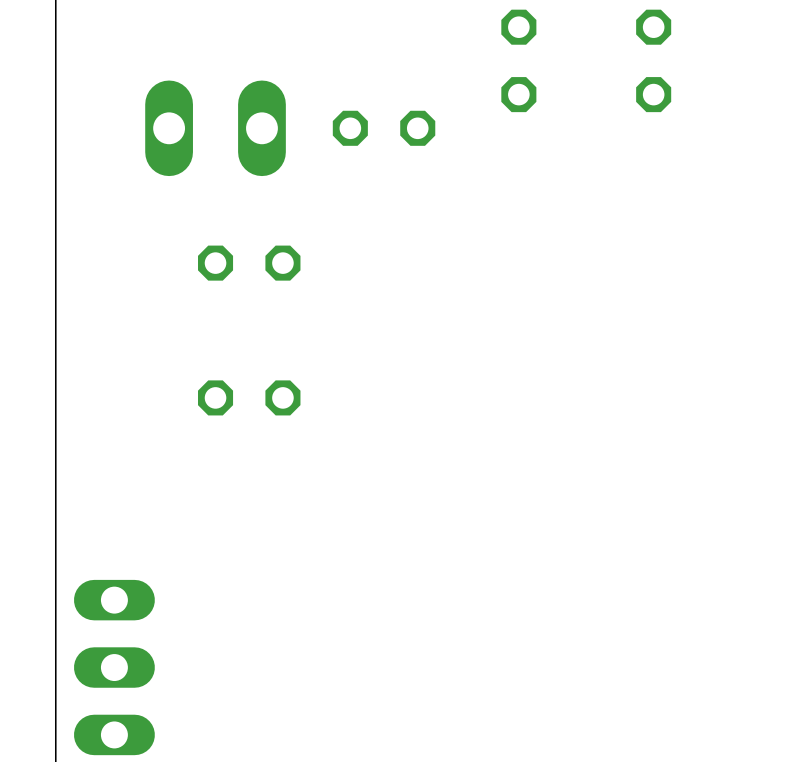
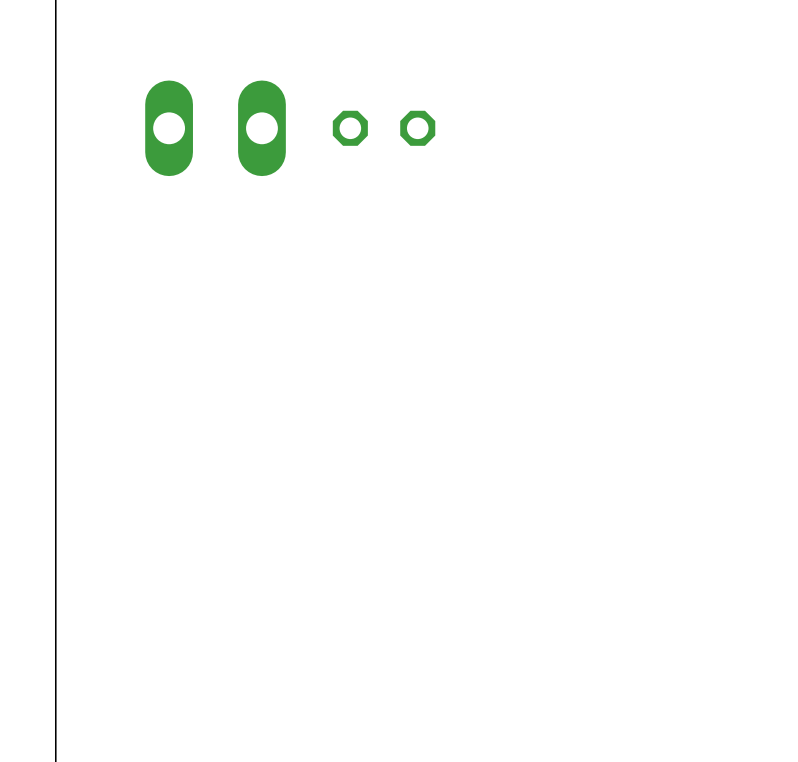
part: (518, 60) -> none
part: (653, 60) -> none
part: (249, 263) -> none
part: (249, 397) -> none
part: (114, 667) -> none

